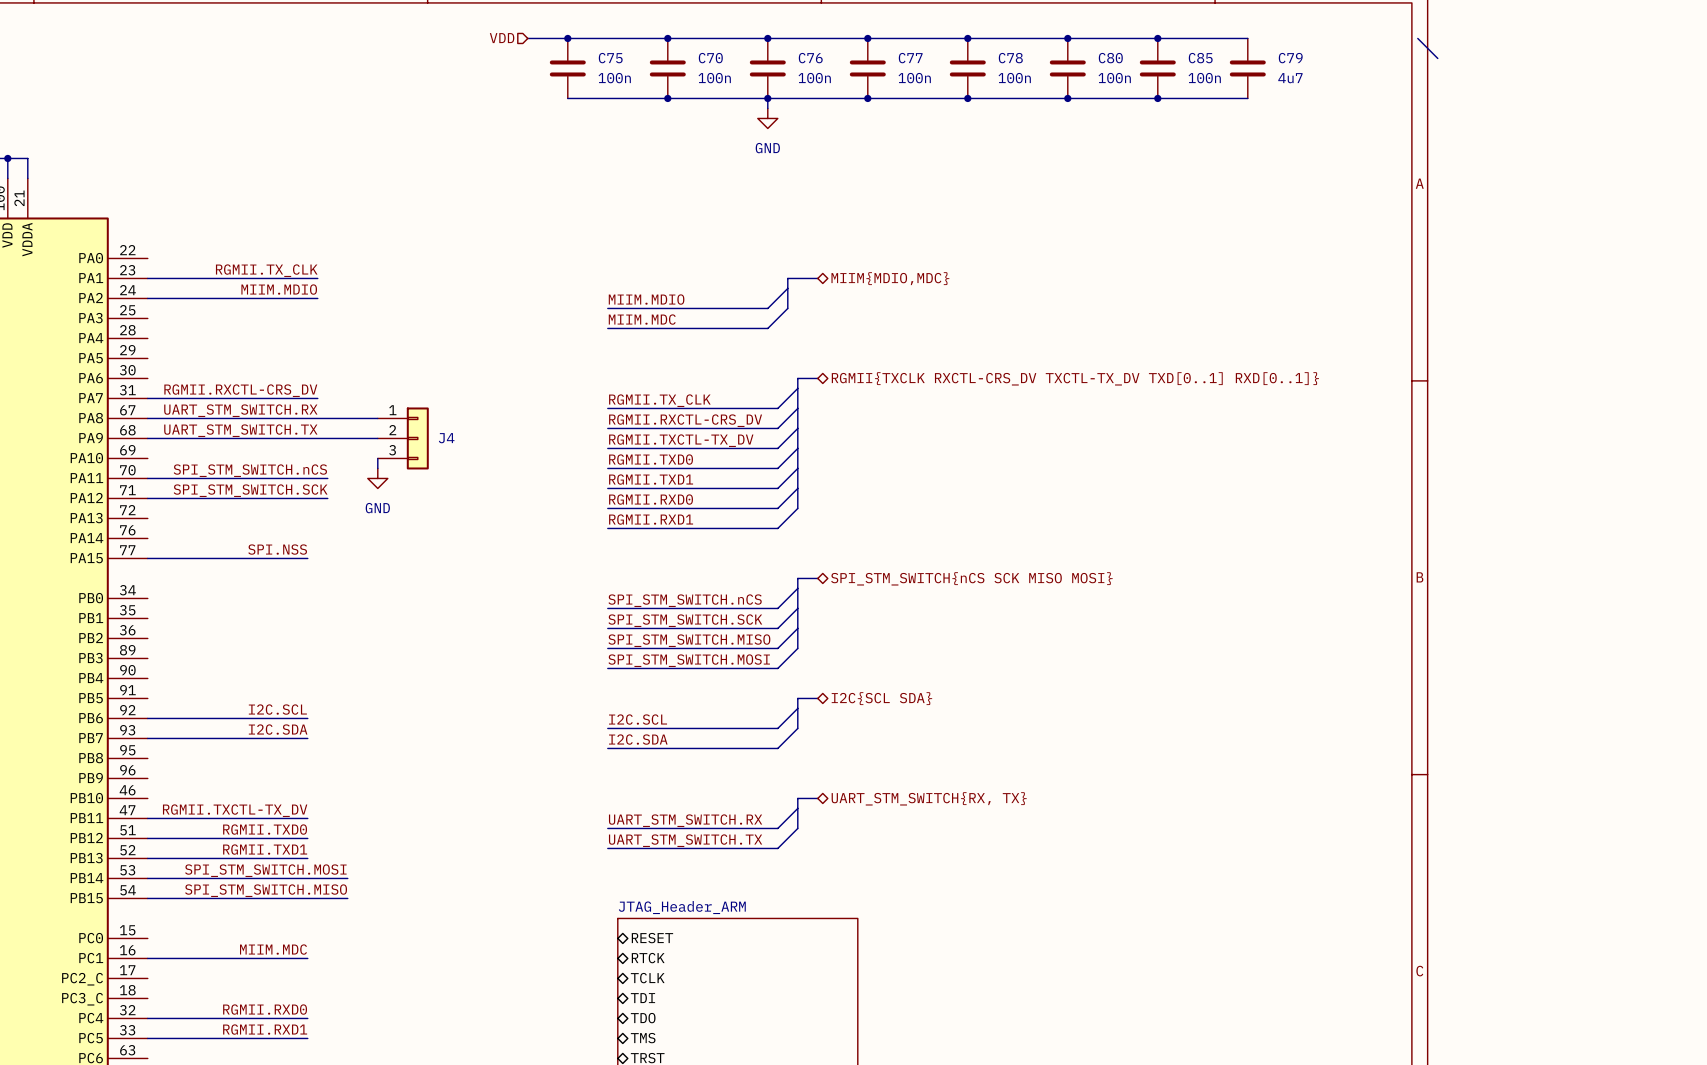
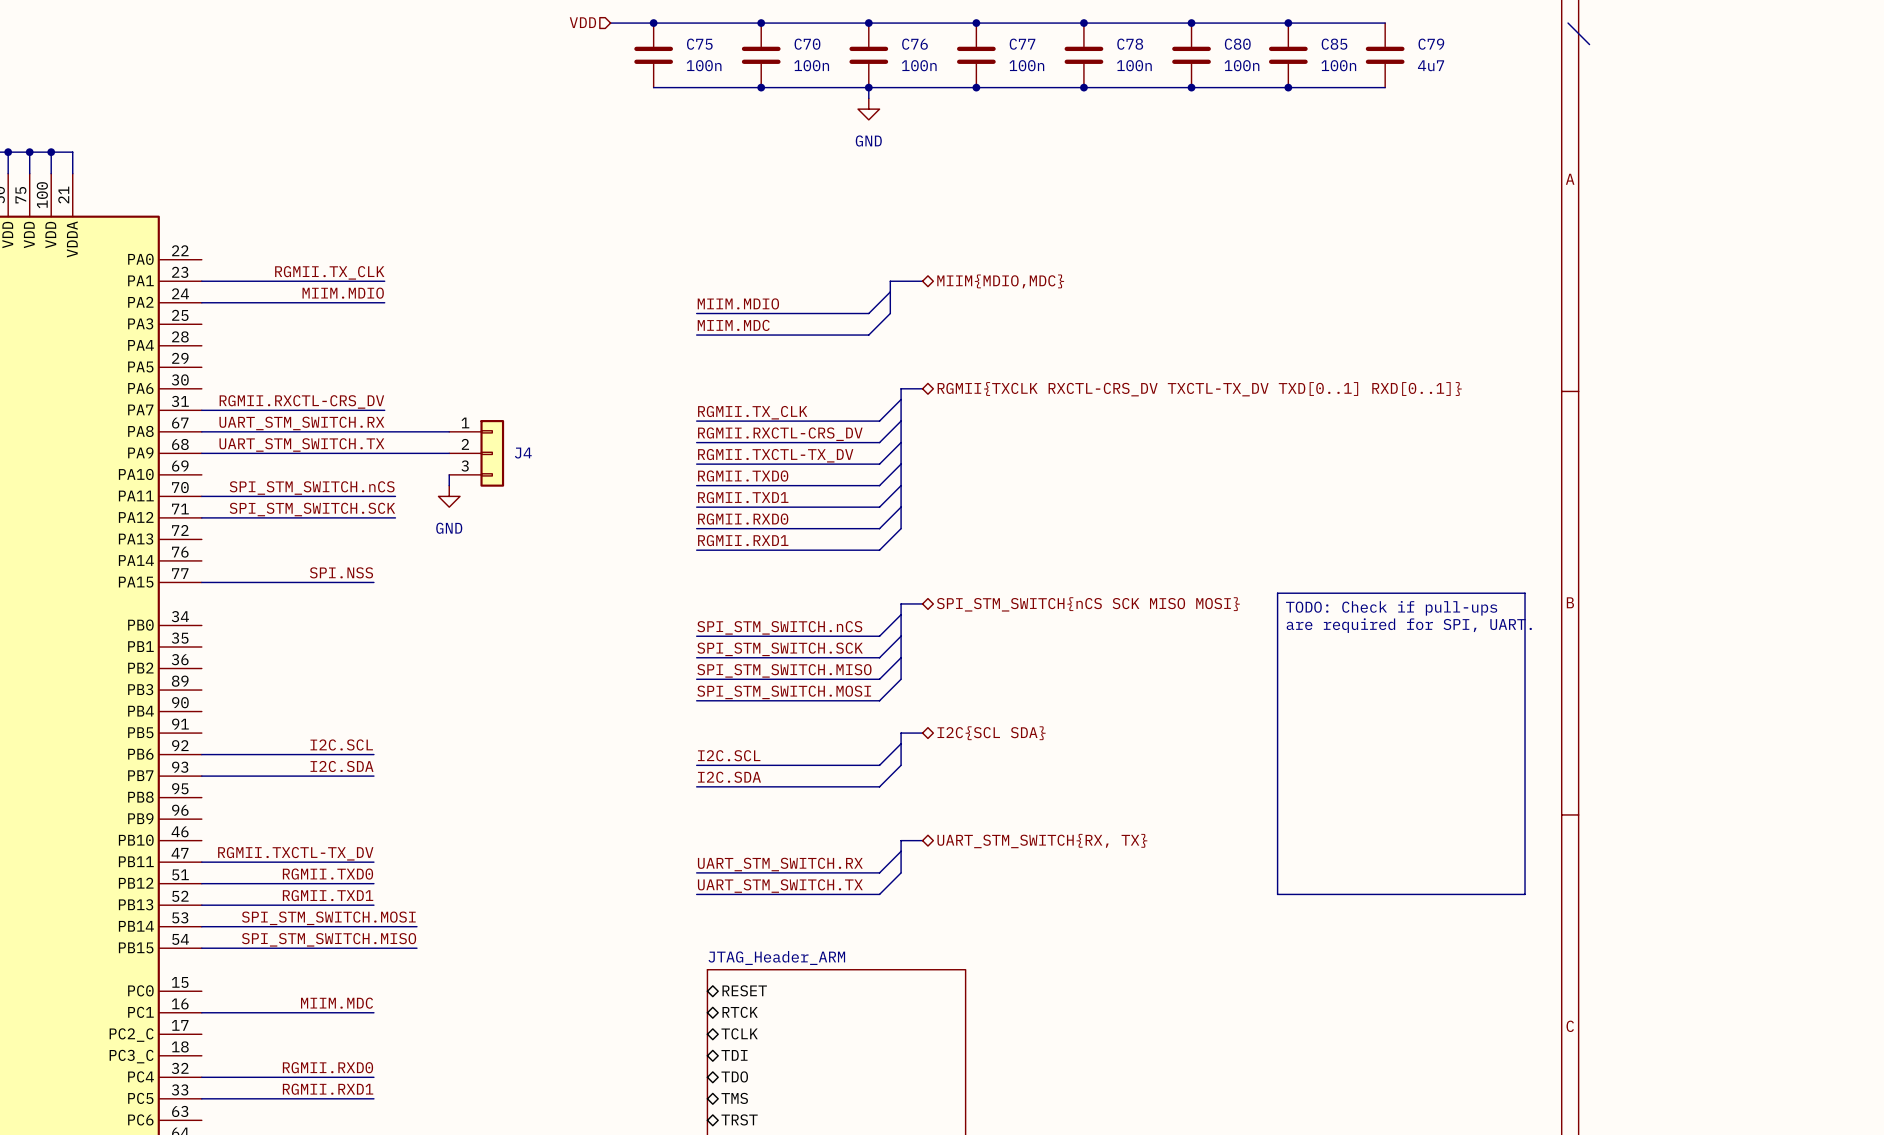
line: none -> (1277, 593) (1525, 593) (1525, 894) (1277, 894) (1277, 593)
text: none -> TODO: Check if pull-ups (1391, 608)
text: none -> are required for SPI, UART. (1409, 625)

